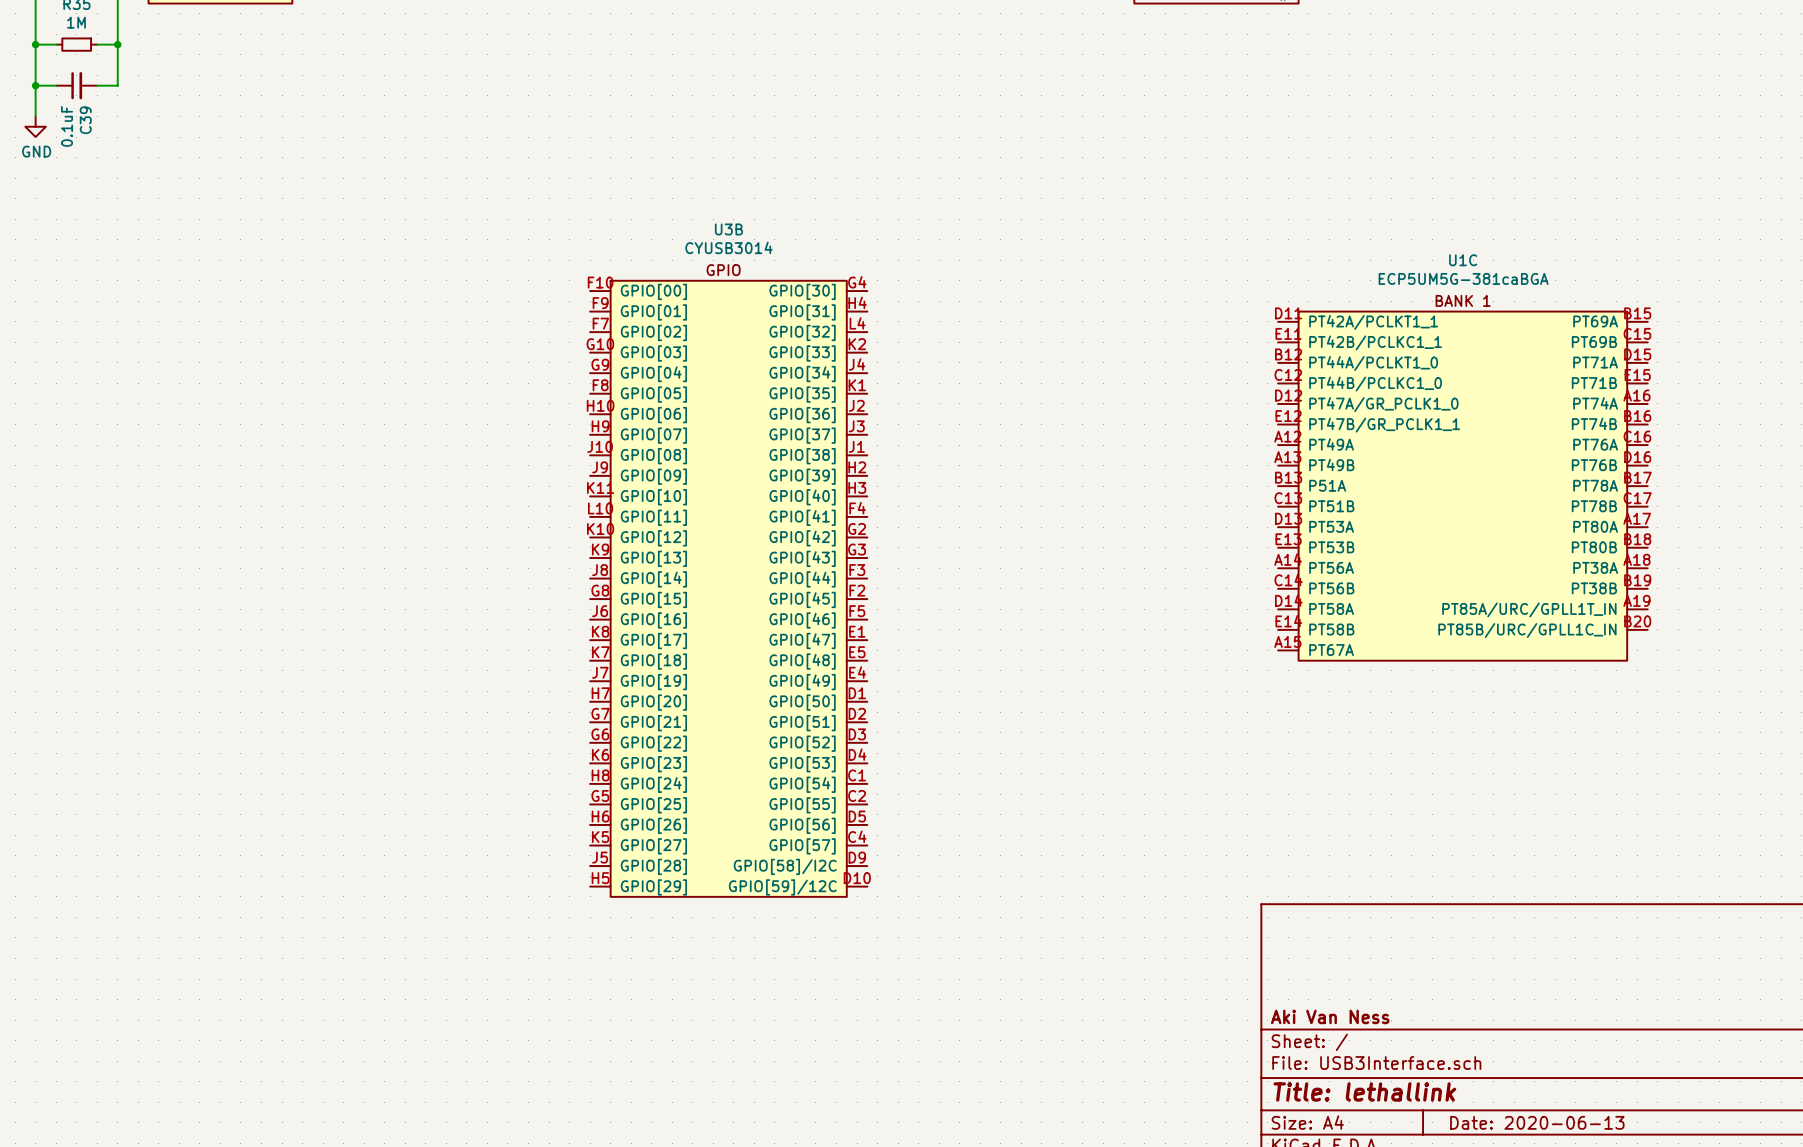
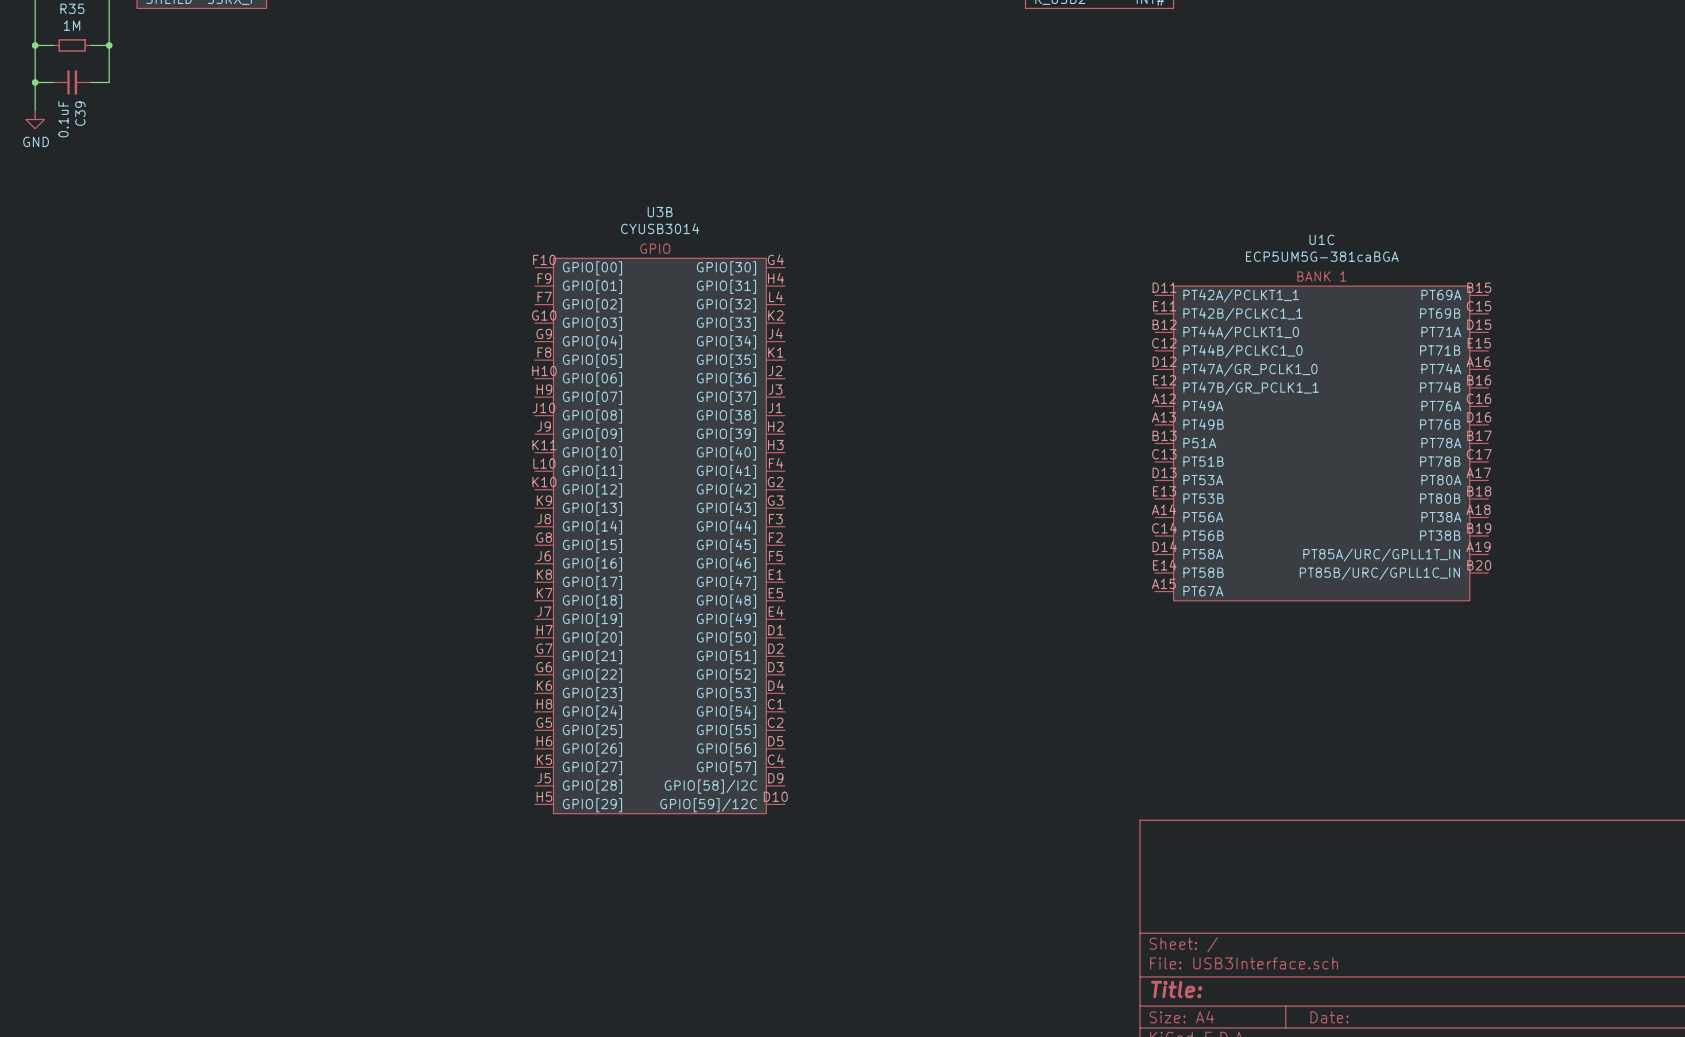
title block: Aki Van Ness (1330, 1016) -> none
title block: Title: lethallink (1364, 1091) -> Title: (1176, 989)
title block: Date: 2020-06-13 (1537, 1122) -> Date: (1329, 1017)

